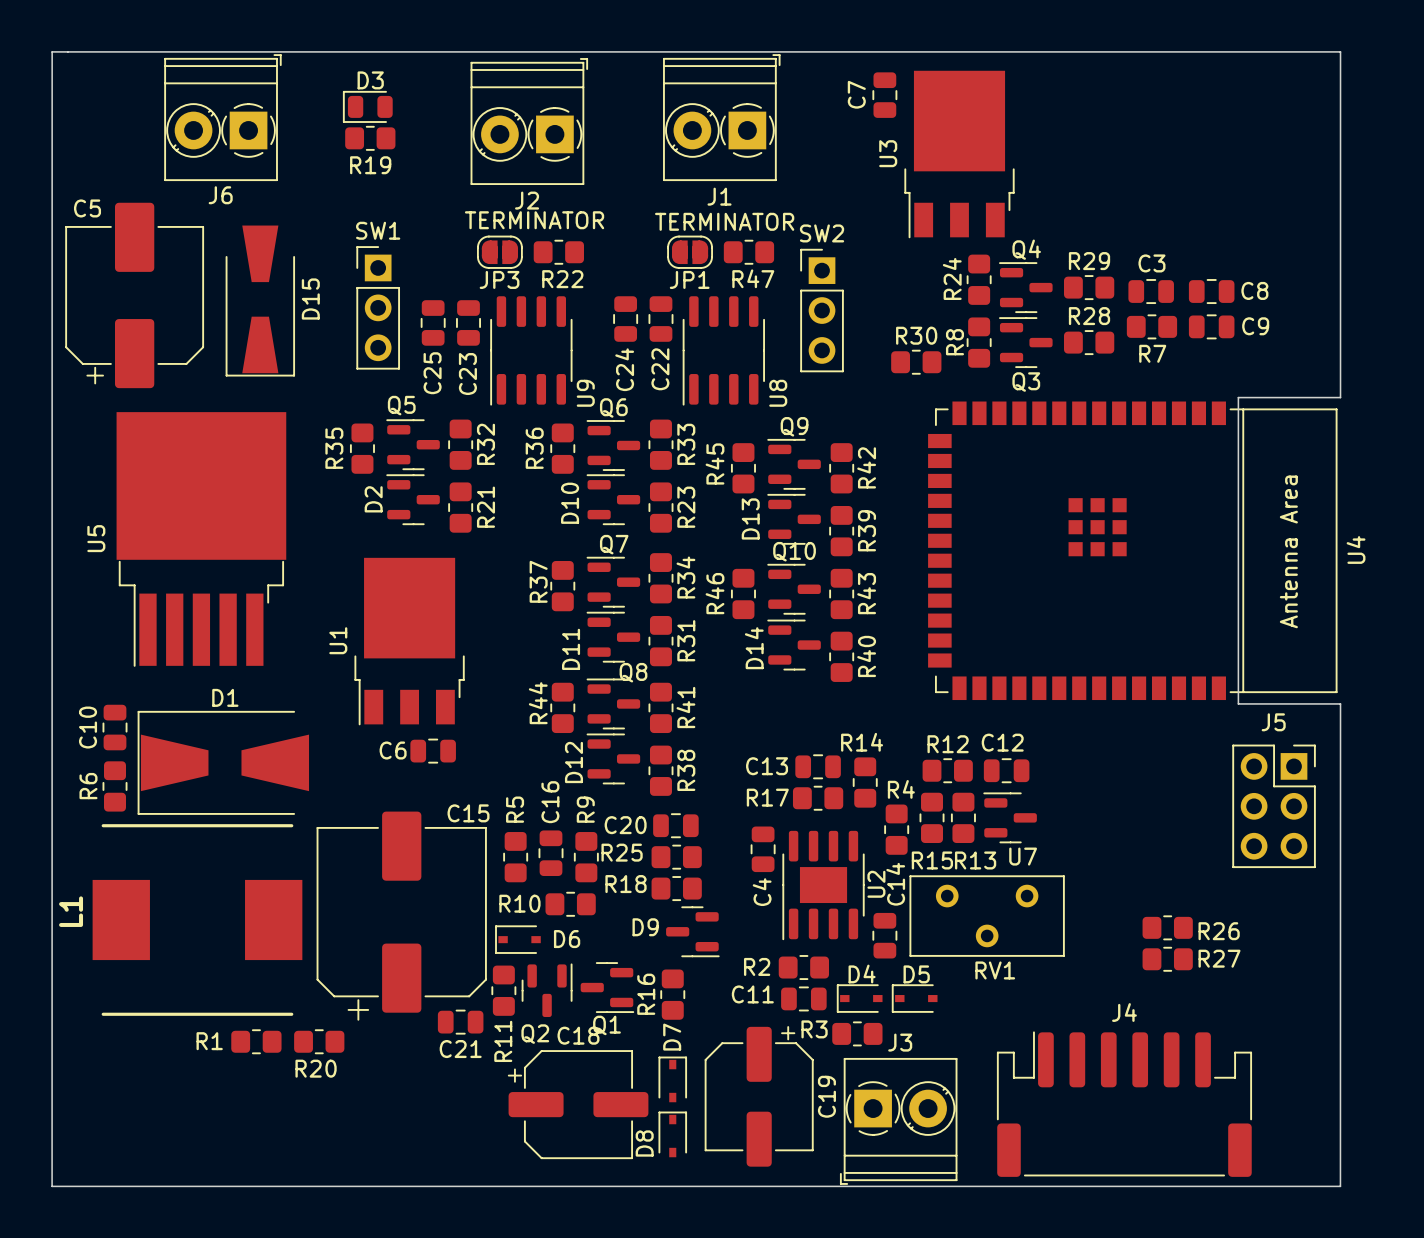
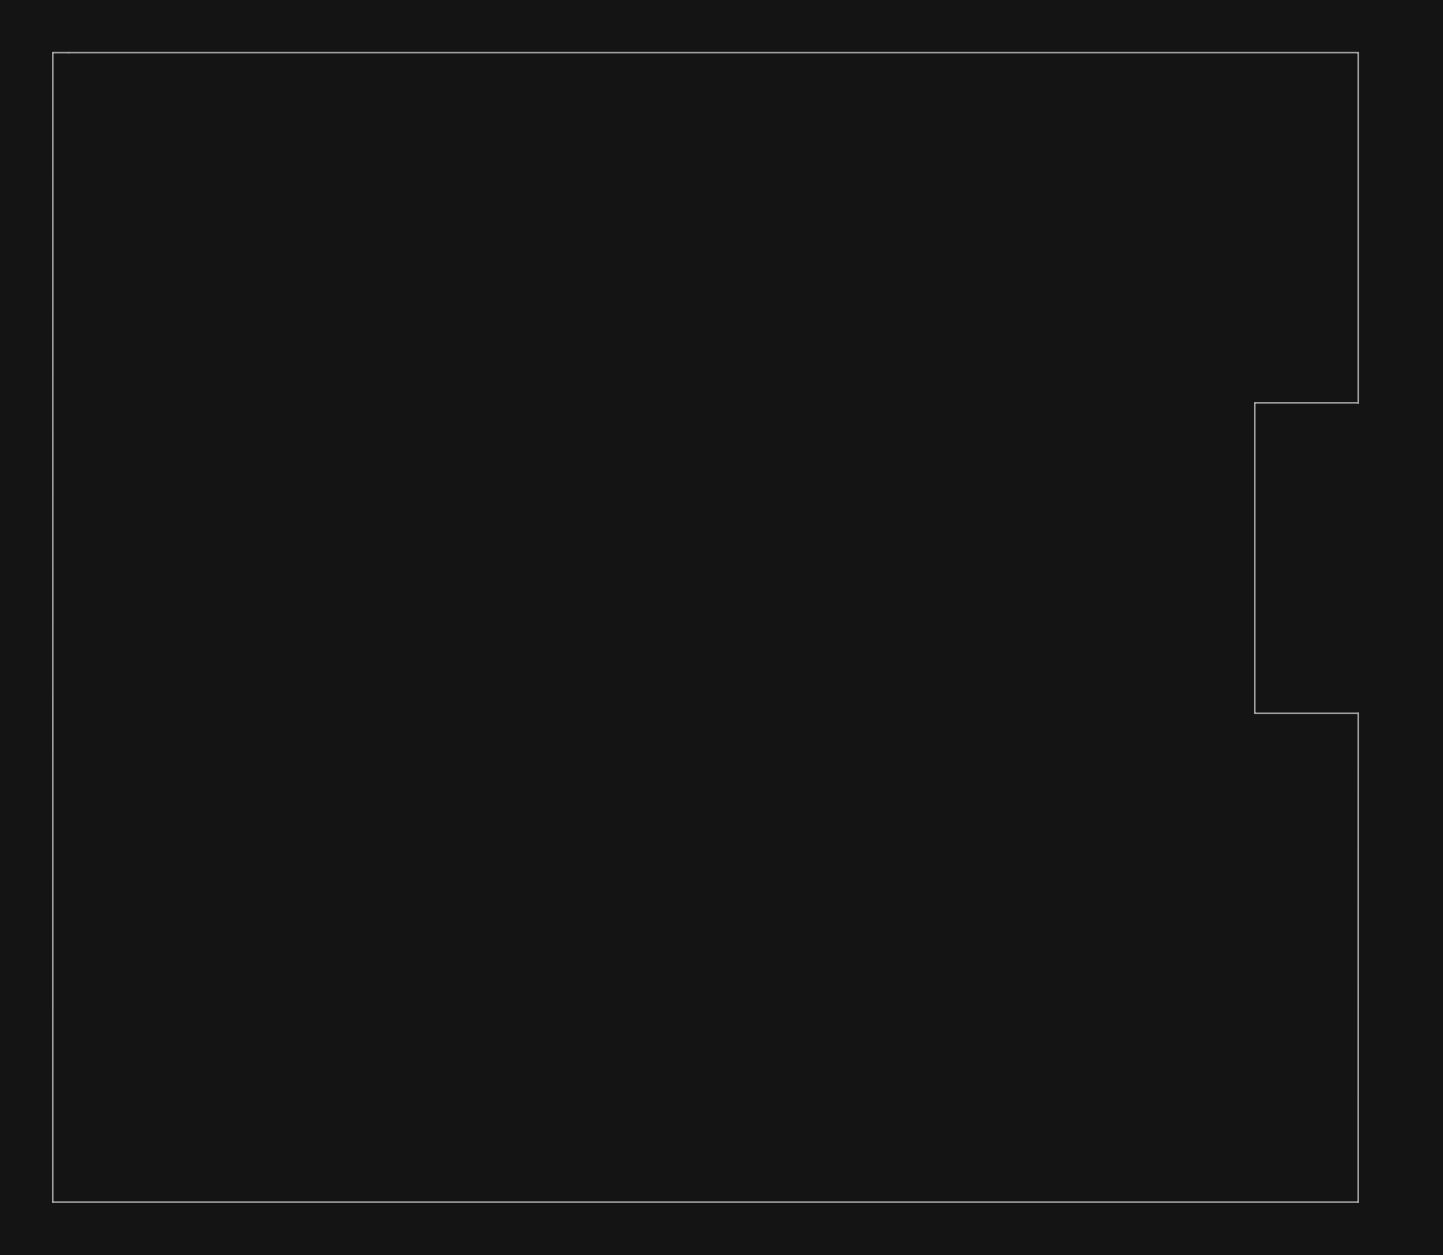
C7: (884, 95) -> none
D3: (367, 106) -> none
J6: (222, 117) -> none
J1: (721, 117) -> none
J2: (529, 121) -> none
R19: (370, 138) -> none
U3: (959, 154) -> none
JP3: TERMINATOR (499, 252) -> none
R22: (558, 252) -> none
JP1: TERMINATOR (690, 252) -> none
R47: (748, 252) -> none
R24: (979, 279) -> none
Q4: (1025, 287) -> none
R29: (1089, 287) -> none
C3: (1151, 291) -> none
C8: (1211, 291) -> none
C5: (134, 295) -> none
D15: (260, 301) -> none
SW1: (378, 307) -> none
SW2: (822, 310) -> none
C24: (625, 319) -> none
C22: (660, 319) -> none
C25: (433, 322) -> none
C23: (468, 322) -> none
R7: (1151, 326) -> none
C9: (1211, 326) -> none
R8: (979, 342) -> none
Q3: (1025, 342) -> none
R28: (1089, 342) -> none
U9: (531, 350) -> none
U8: (723, 350) -> none
R30: (916, 362) -> none
Q5: (413, 444) -> none
R32: (460, 444) -> none
R33: (660, 444) -> none
Q6: (613, 445) -> none
R35: (362, 448) -> none
R36: (562, 448) -> none
Q9: (794, 464) -> none
R45: (743, 468) -> none
R42: (841, 468) -> none
D2: (413, 499) -> none
D10: (613, 499) -> none
R21: (460, 507) -> none
R23: (660, 507) -> none
D13: (794, 519) -> none
R39: (841, 531) -> none
U5: (201, 539) -> none
U4: (1132, 550) -> none
R34: (660, 578) -> none
Q7: (613, 582) -> none
R37: (562, 586) -> none
Q10: (794, 589) -> none
R46: (743, 593) -> none
R43: (841, 593) -> none
D11: (613, 637) -> none
U1: (409, 641) -> none
R31: (660, 641) -> none
D14: (794, 645) -> none
R40: (841, 656) -> none
Q8: (613, 703) -> none
R44: (562, 707) -> none
R41: (660, 707) -> none
C10: (114, 727) -> none
C6: (433, 751) -> none
D12: (613, 758) -> none
D1: (223, 762) -> none
C13: (818, 766) -> none
R38: (660, 770) -> none
R12: (947, 770) -> none
C12: (1006, 770) -> none
R14: (865, 782) -> none
R6: (114, 786) -> none
R17: (818, 798) -> none
J5: (1274, 806) -> none
R15: (932, 817) -> none
R13: (963, 817) -> none
U7: (1010, 817) -> none
C20: (675, 825) -> none
R4: (896, 829) -> none
C4: (763, 849) -> none
C16: (551, 853) -> none
R5: (515, 857) -> none
R9: (586, 857) -> none
R25: (676, 857) -> none
U2: (823, 885) -> none
R18: (676, 888) -> none
R10: (570, 904) -> none
C15: (401, 916) -> none
RV1: (987, 916) -> none
L1: (197, 920) -> none
R26: (1167, 927) -> none
D9: (692, 931) -> none
C14: (884, 935) -> none
D6: (517, 939) -> none
R27: (1167, 959) -> none
R2: (803, 967) -> none
Q1: (607, 987) -> none
R11: (503, 990) -> none
Q2: (547, 990) -> none
R16: (672, 994) -> none
C11: (803, 998) -> none
D4: (859, 998) -> none
D5: (914, 998) -> none
C21: (460, 1022) -> none
R3: (857, 1033) -> none
R1: (256, 1041) -> none
R20: (319, 1041) -> none
D7: (672, 1079) -> none
C19: (759, 1096) -> none
C18: (578, 1104) -> none
J4: (1124, 1104) -> none
J3: (898, 1121) -> none
D8: (672, 1134) -> none

